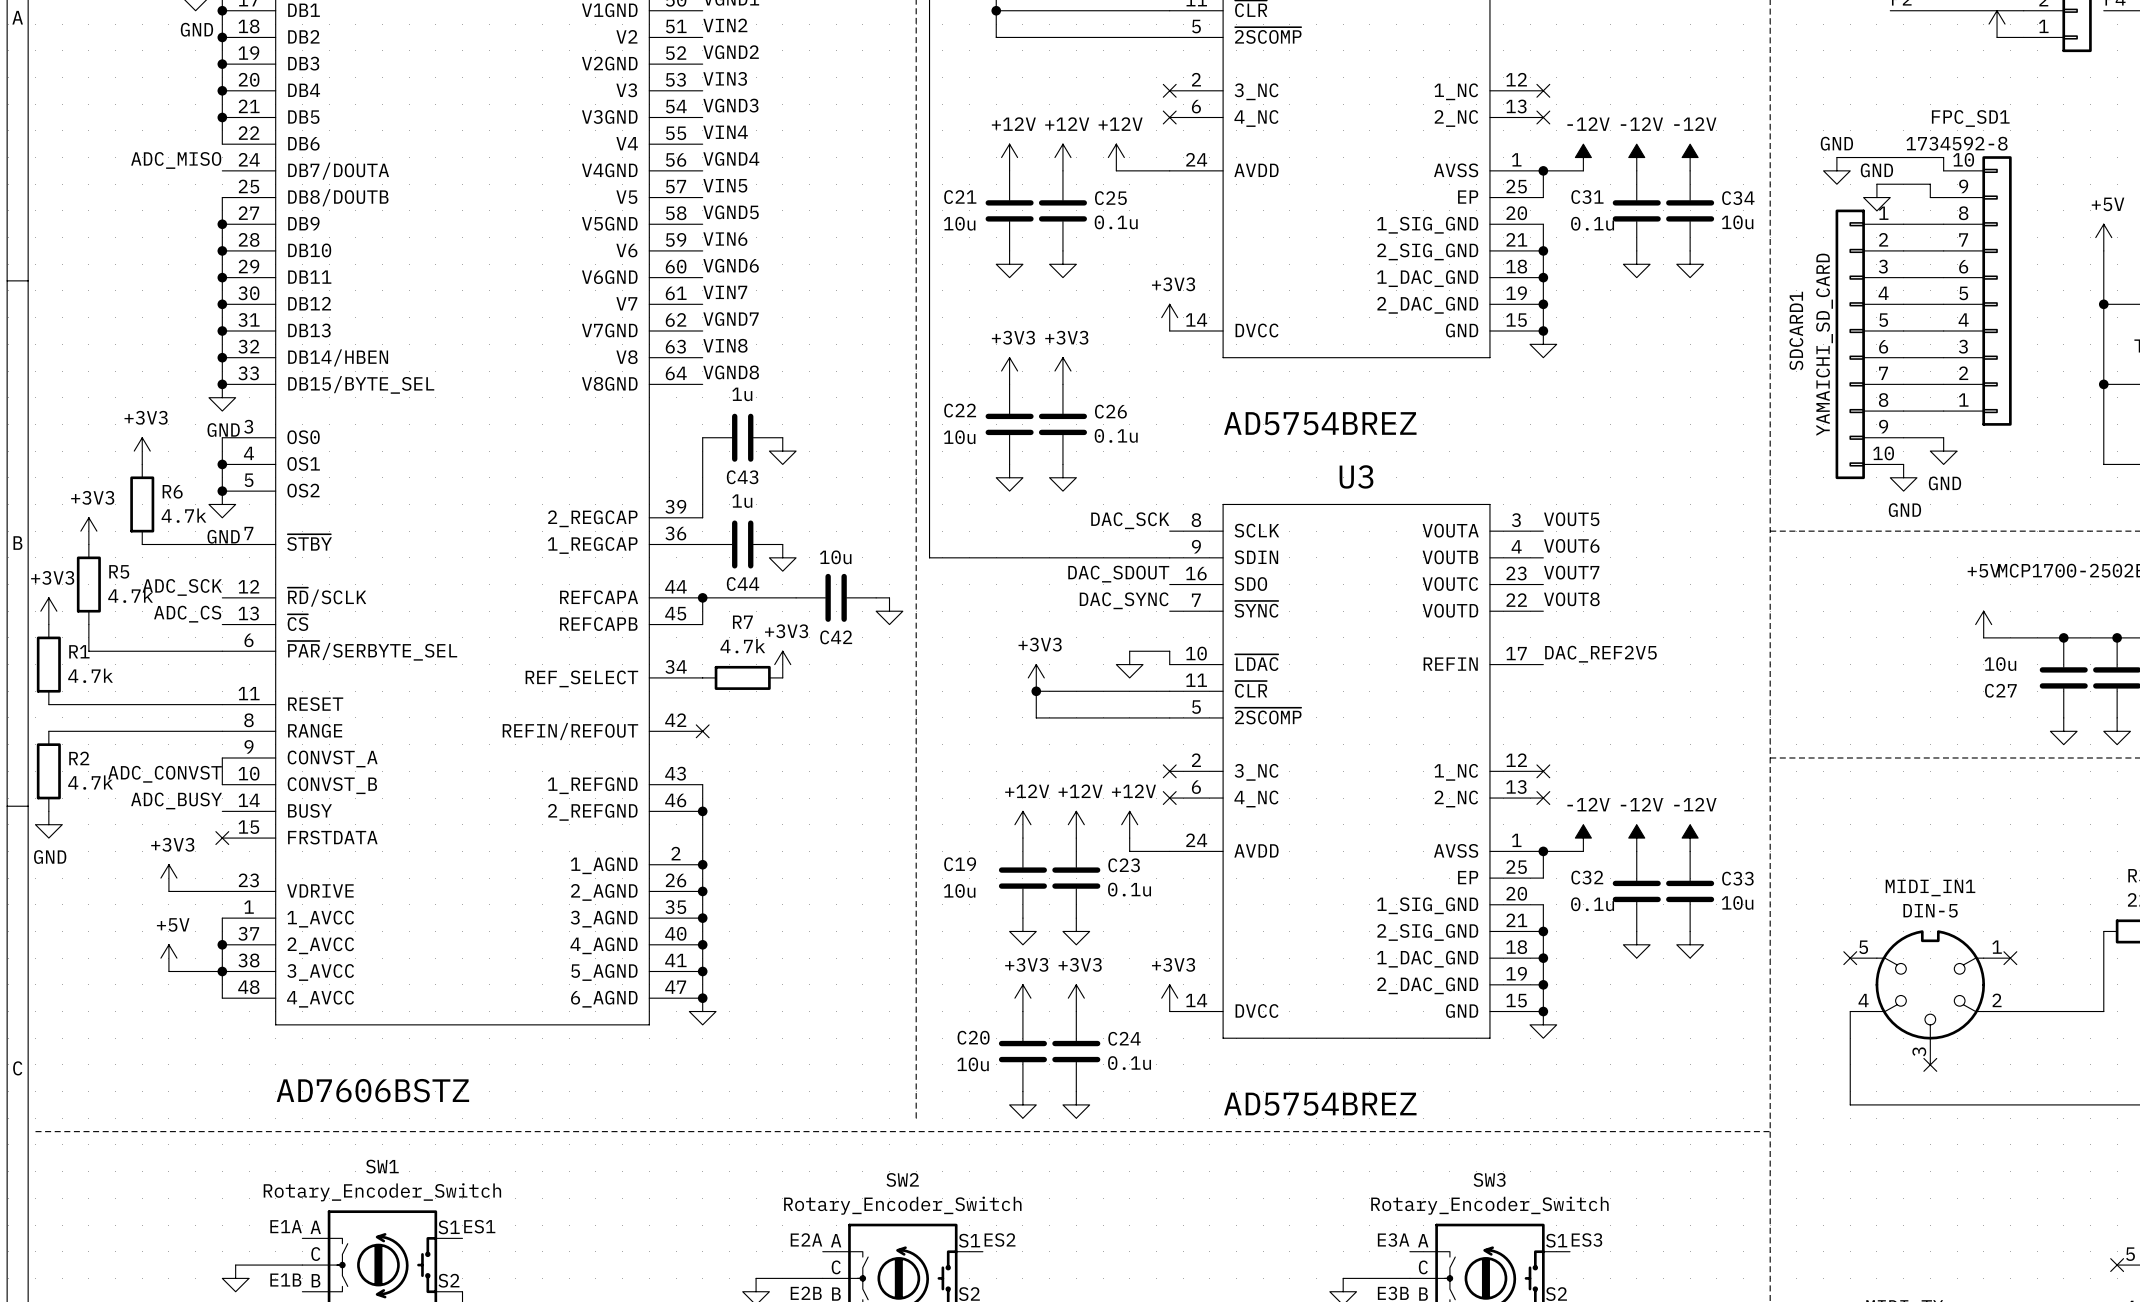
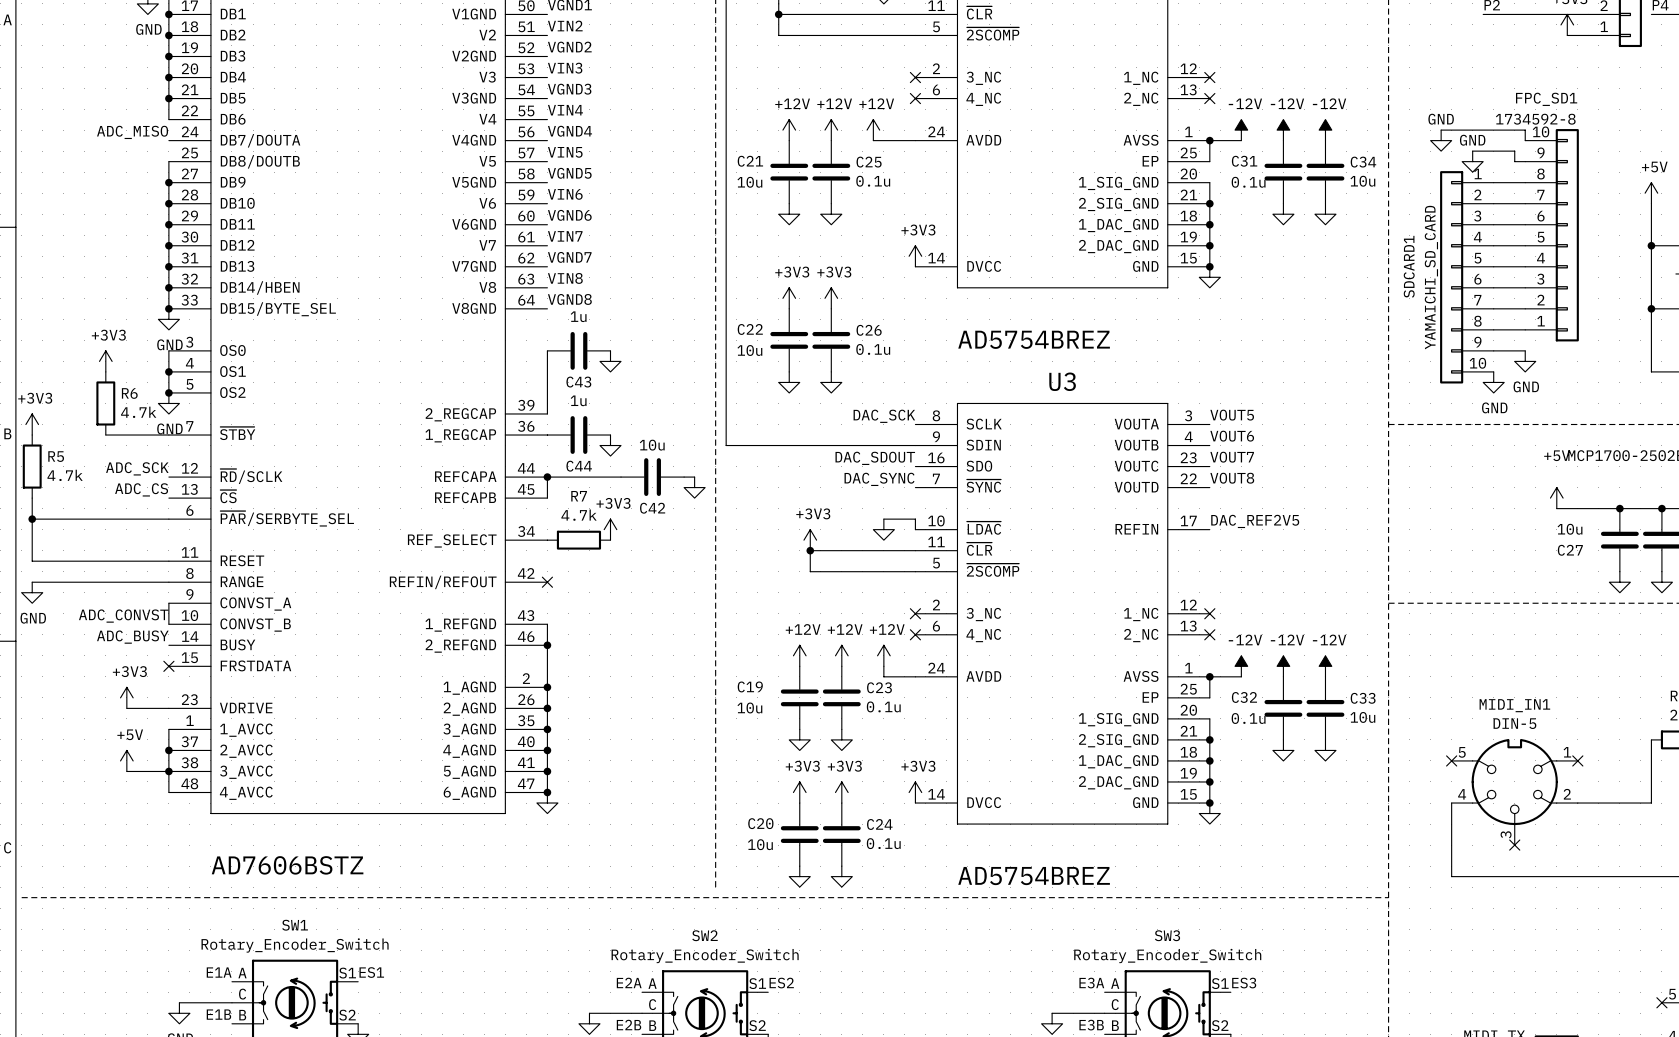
power symbol: none -> +3V3 (32, 424)
power symbol: +3V3 (88, 531) -> none
R5 position: (88, 584) -> (32, 466)
power symbol: +3V3 (48, 611) -> none
wire: none -> (32, 498) (32, 561)
wire: (88, 624) (88, 651) -> (32, 519) (63, 519)
junction: none -> (32, 519)
R1: 4.7k (48, 664) -> none
R2: 4.7k (48, 771) -> none
power symbol position: GND (48, 824) -> GND (32, 592)

